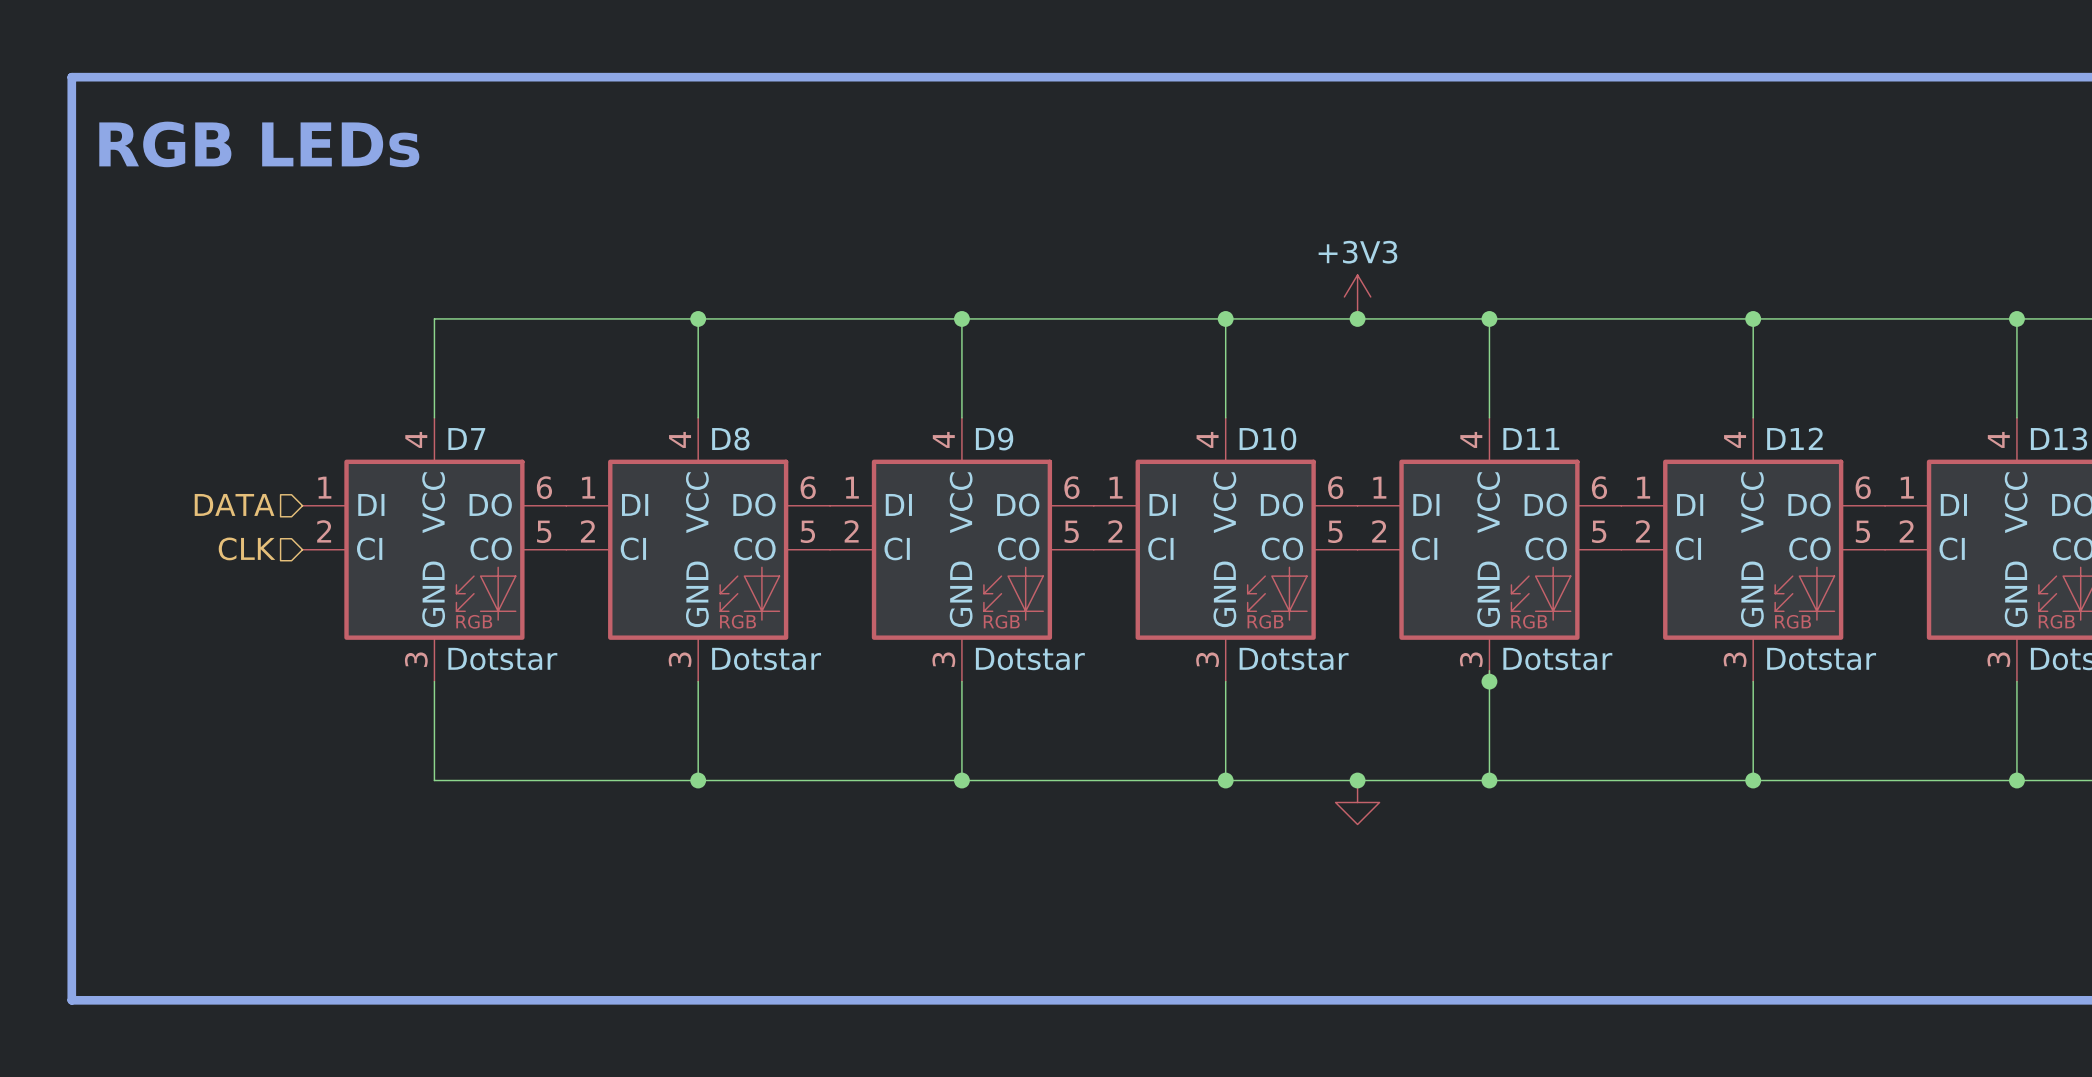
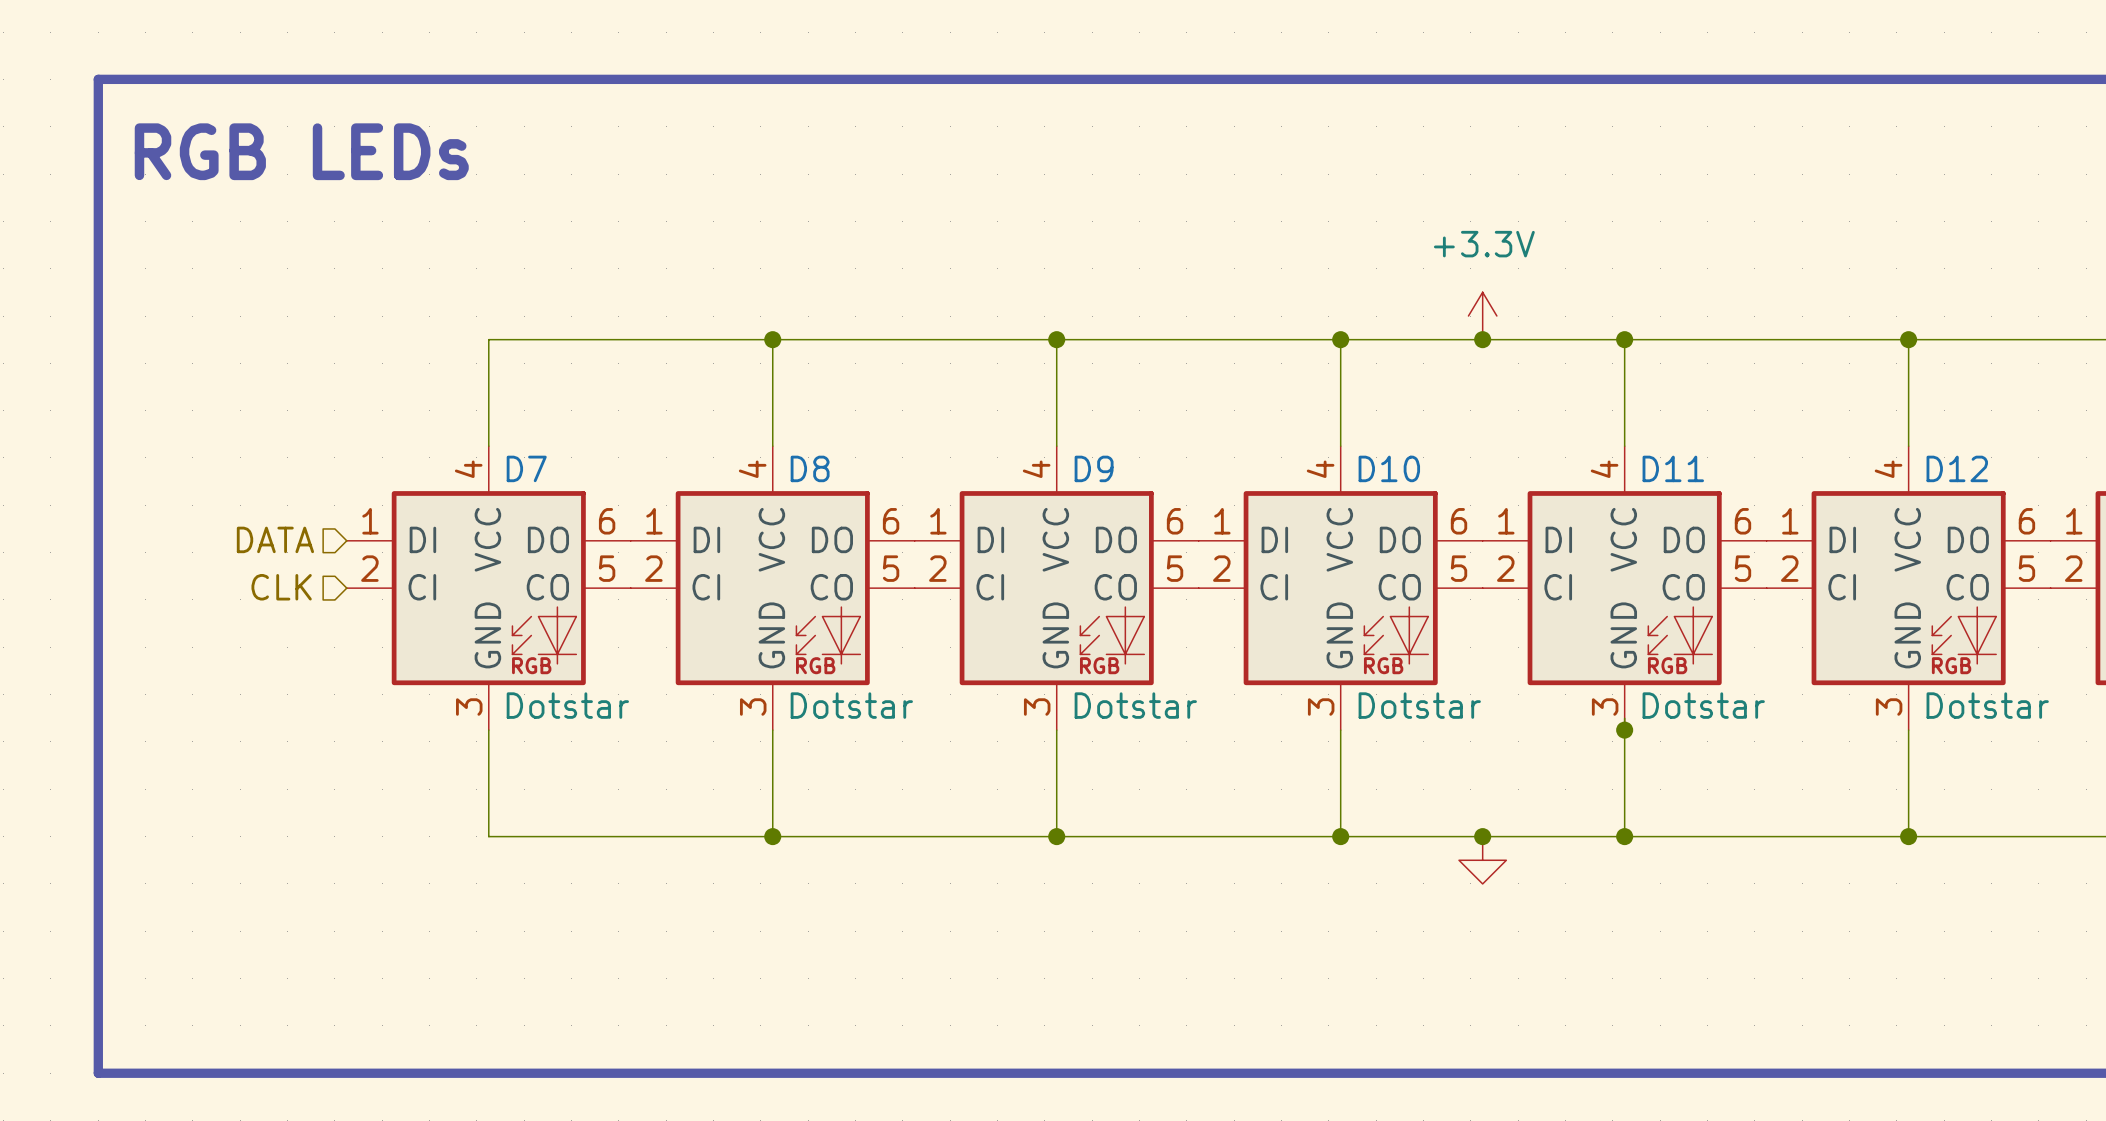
power symbol: +3V3 (1357, 296) -> +3.3V (1482, 316)

